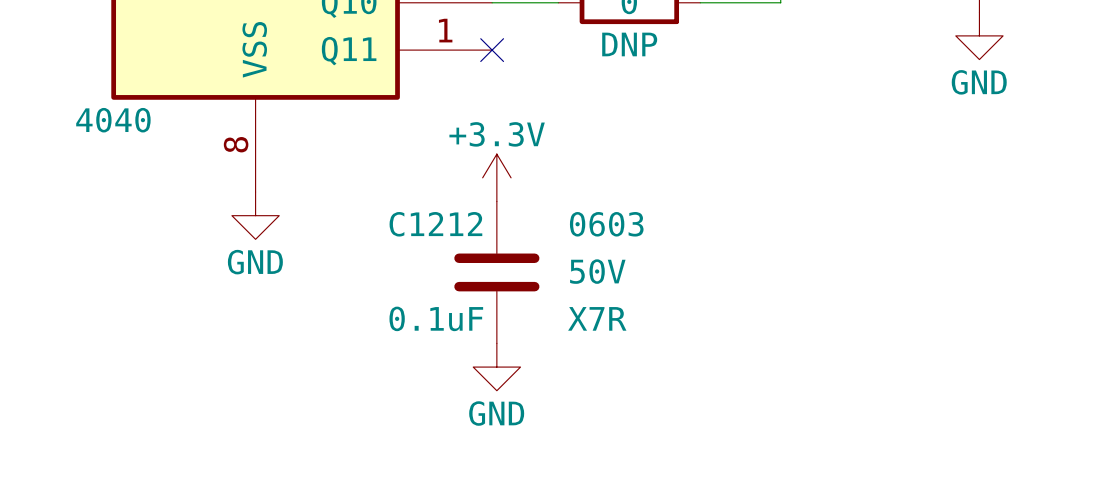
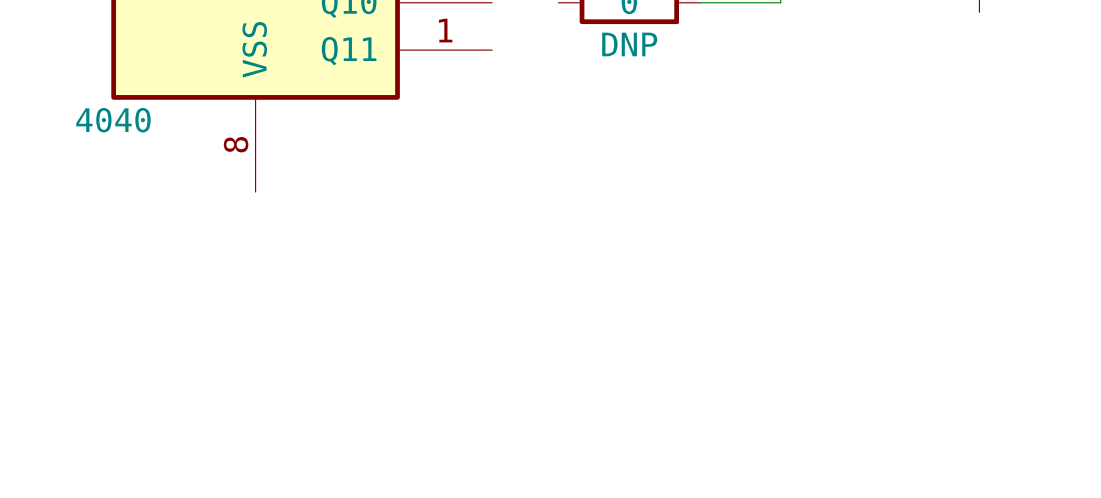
wire: (492, 2) (558, 2) -> none
power symbol: GND (979, 35) -> none
no-connect mark: (492, 50) -> none
power symbol: +3.3V (496, 177) -> none
power symbol: GND (255, 215) -> none
C1212: 0.1uF (496, 272) -> none
power symbol: GND (496, 367) -> none

